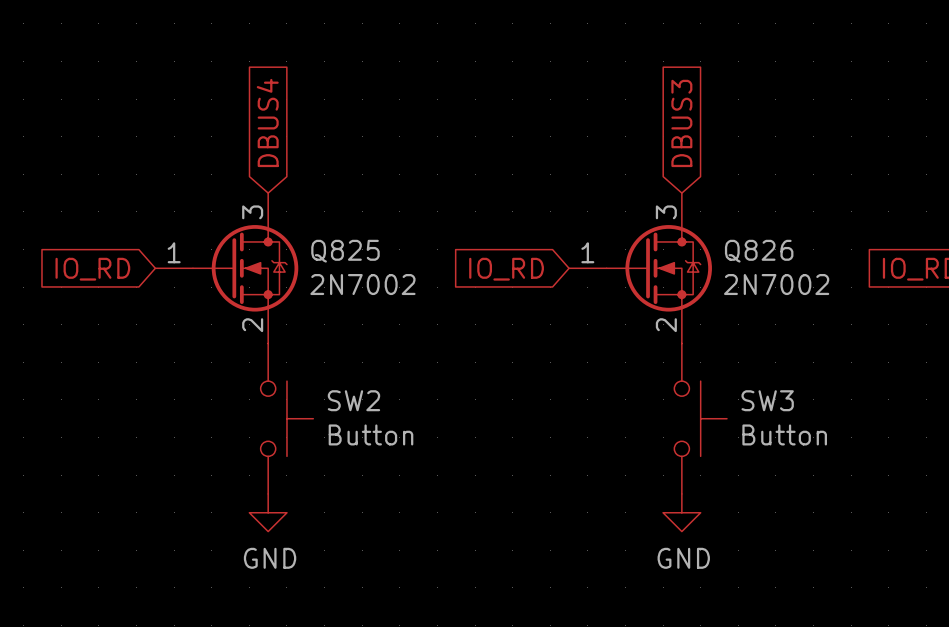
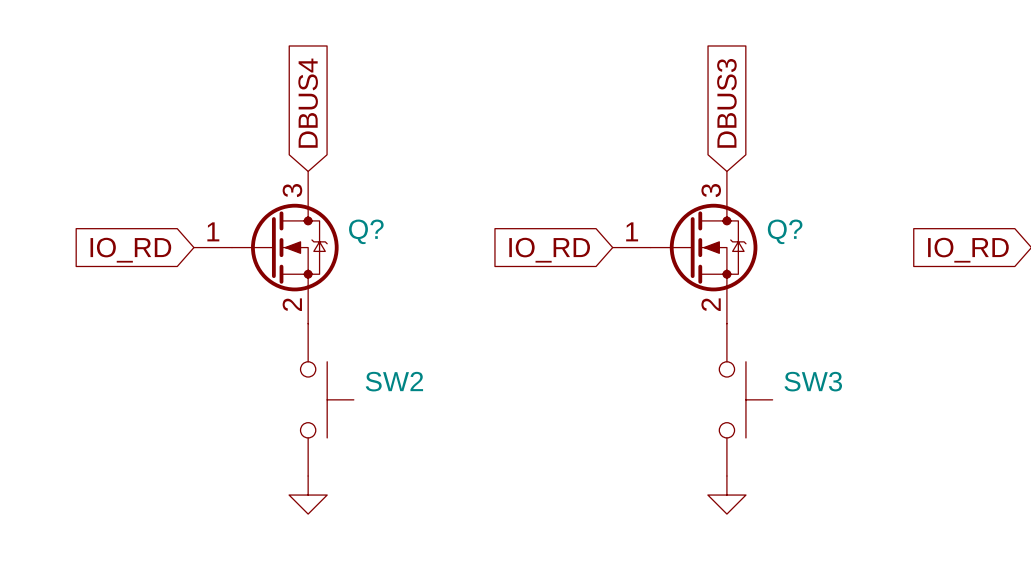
Q825 name: Q825 (345, 251) -> Q? (366, 231)
Q826 name: Q826 (759, 251) -> Q? (785, 231)
Q825 value: 2N7002 (362, 284) -> none
Q826 value: 2N7002 (776, 284) -> none
SW2 value: Button (370, 434) -> none
SW3 value: Button (784, 434) -> none
power symbol text: GND (270, 558) -> none
power symbol text: GND (683, 558) -> none

